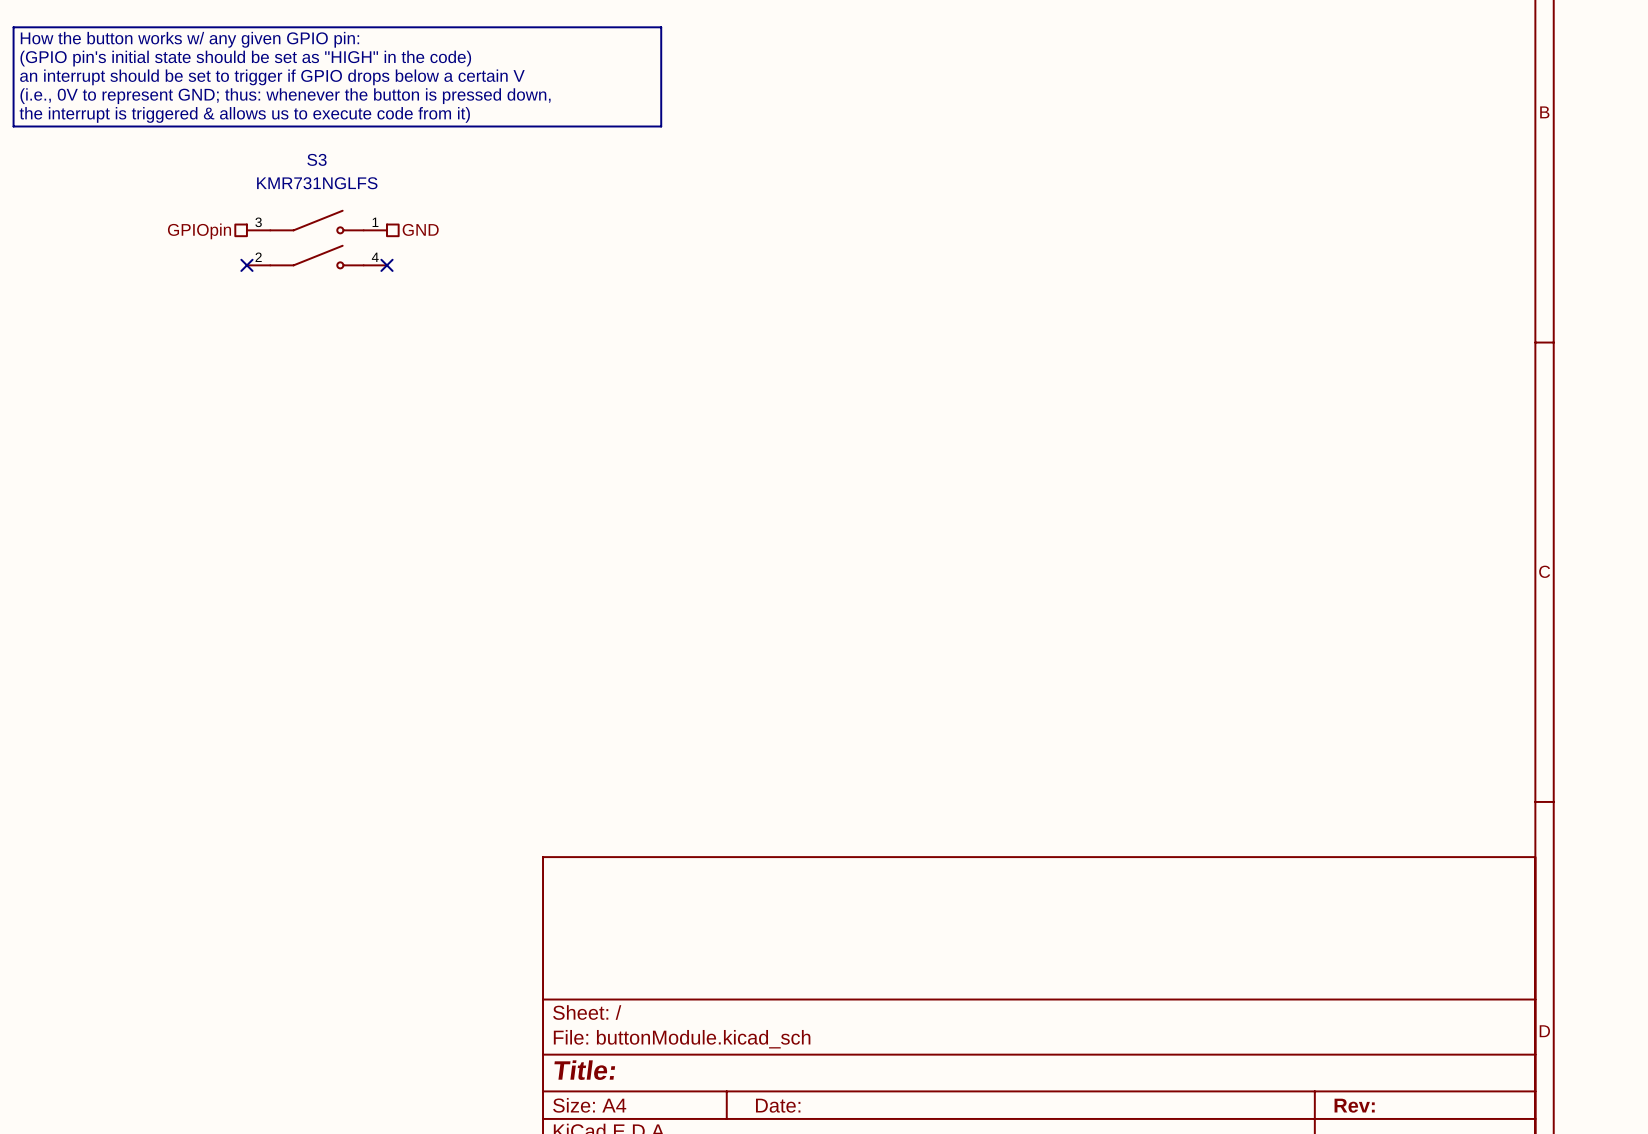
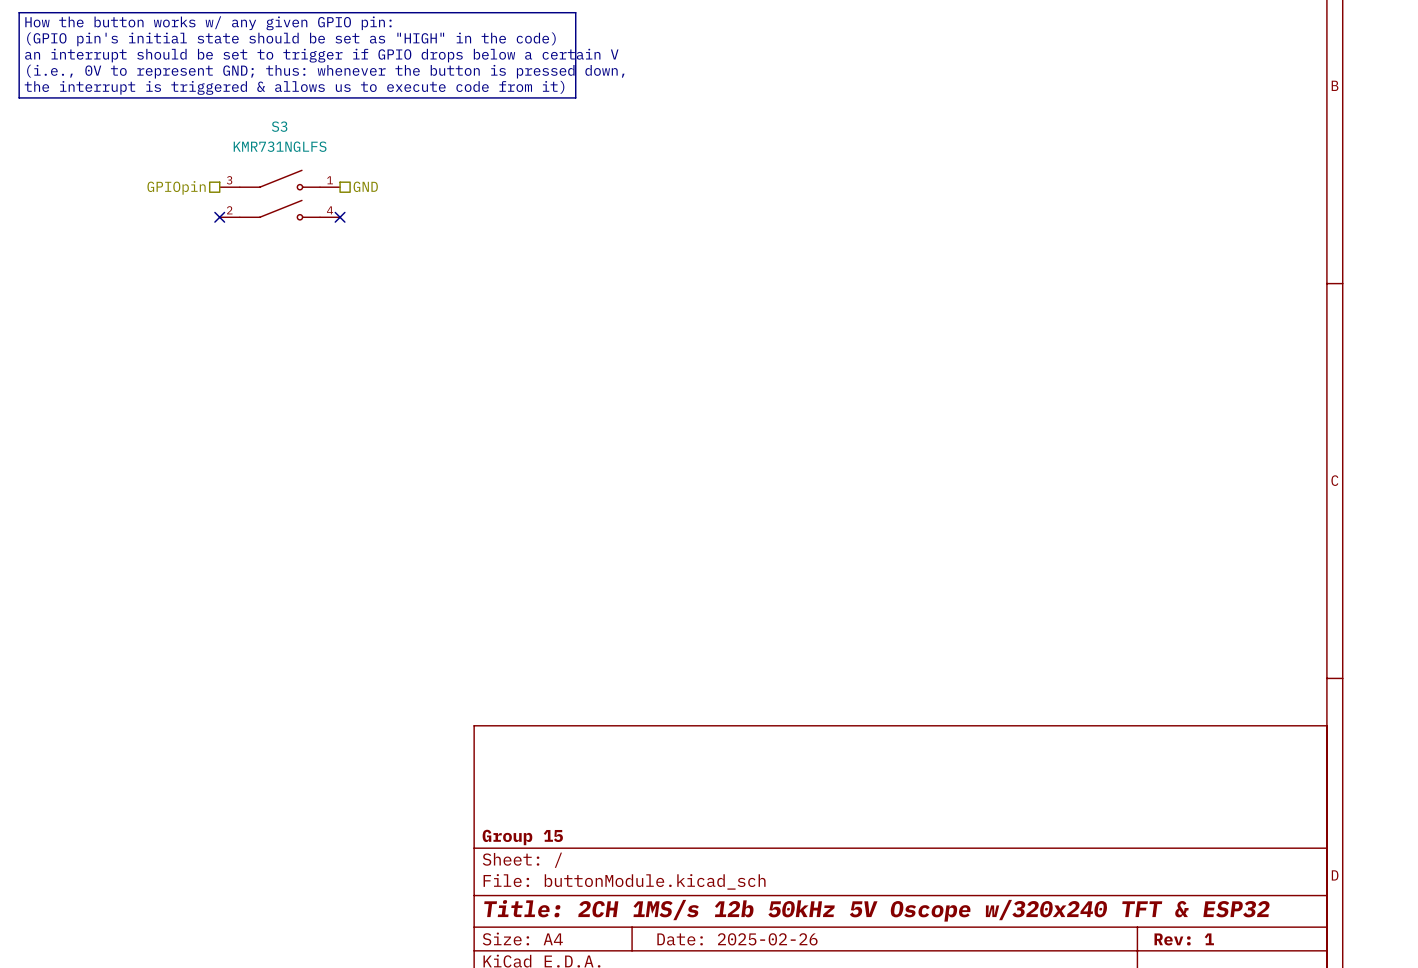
title block: none -> Group 15 (522, 837)
title block: Title: (584, 1070) -> Title: 2CH 1MS/s 12b 50kHz 5V Oscope w/320x240 TFT & ESP32 (876, 910)
title block: Date: (778, 1105) -> Date: 2025-02-26 (737, 939)
title block: Rev: (1354, 1105) -> Rev: 1 (1184, 939)

